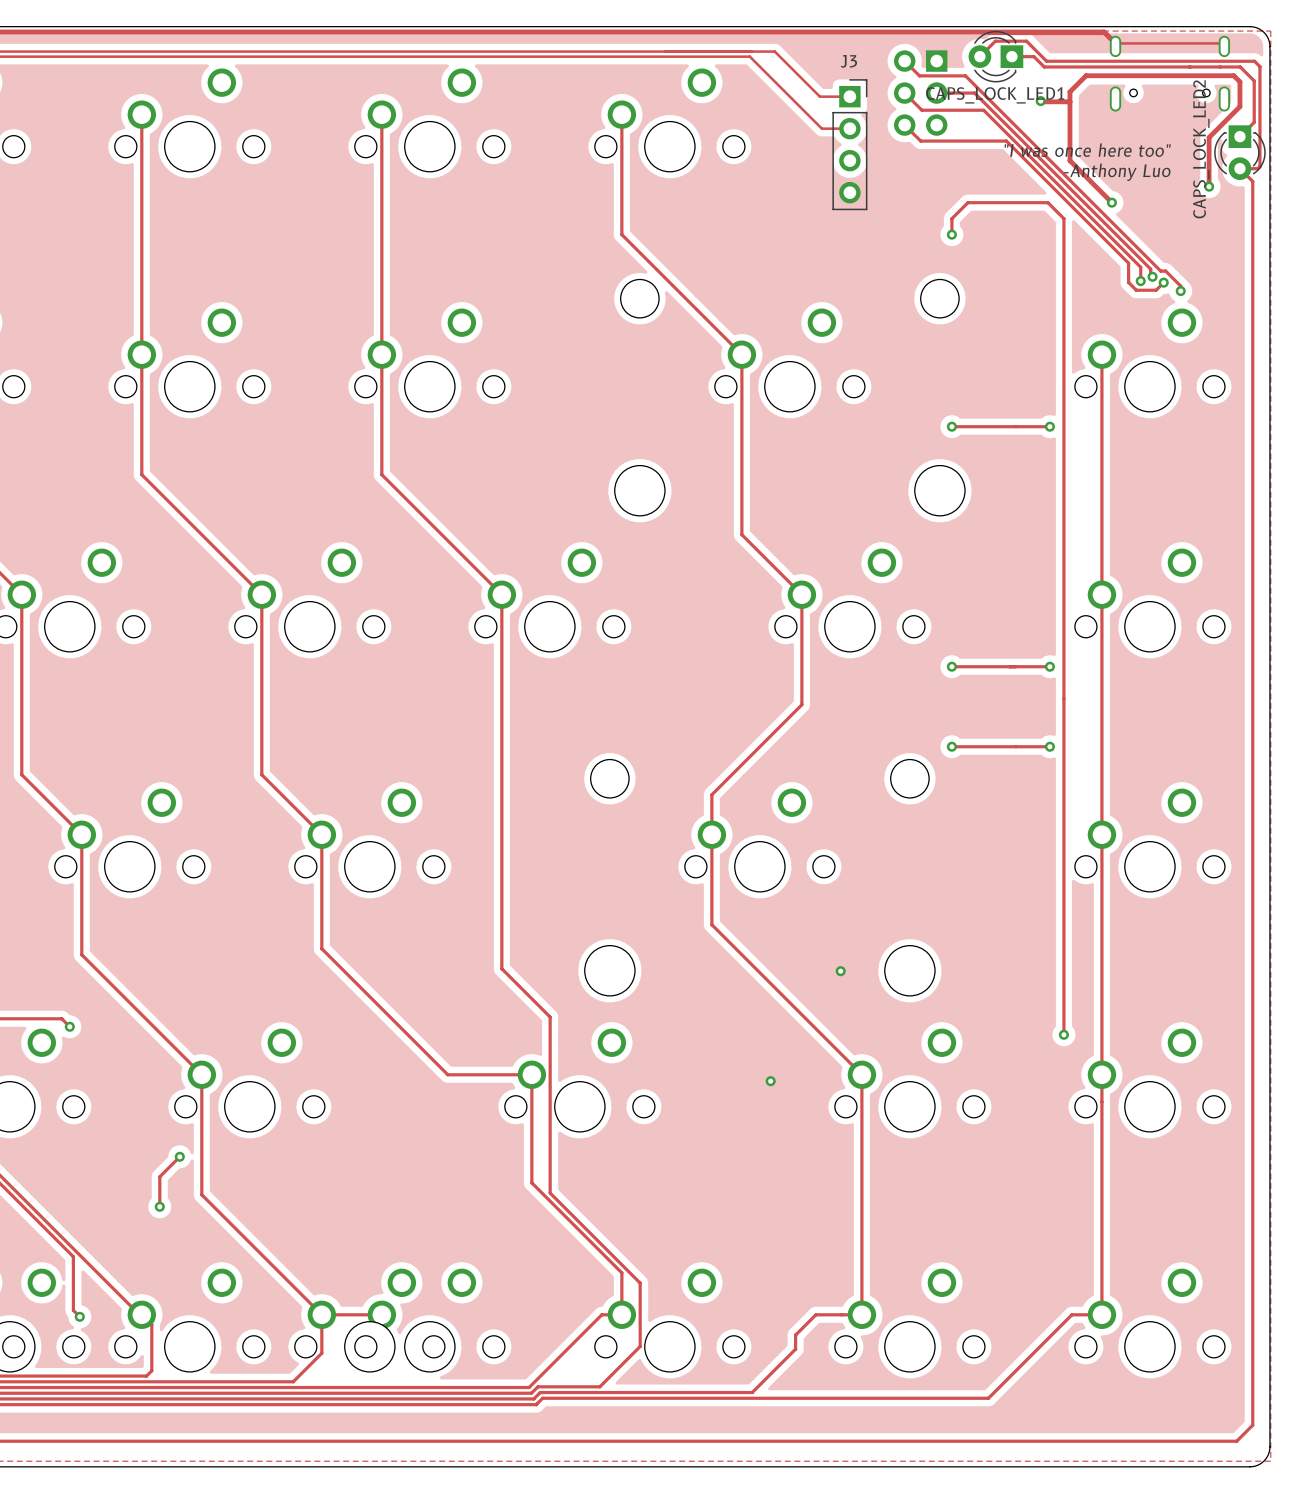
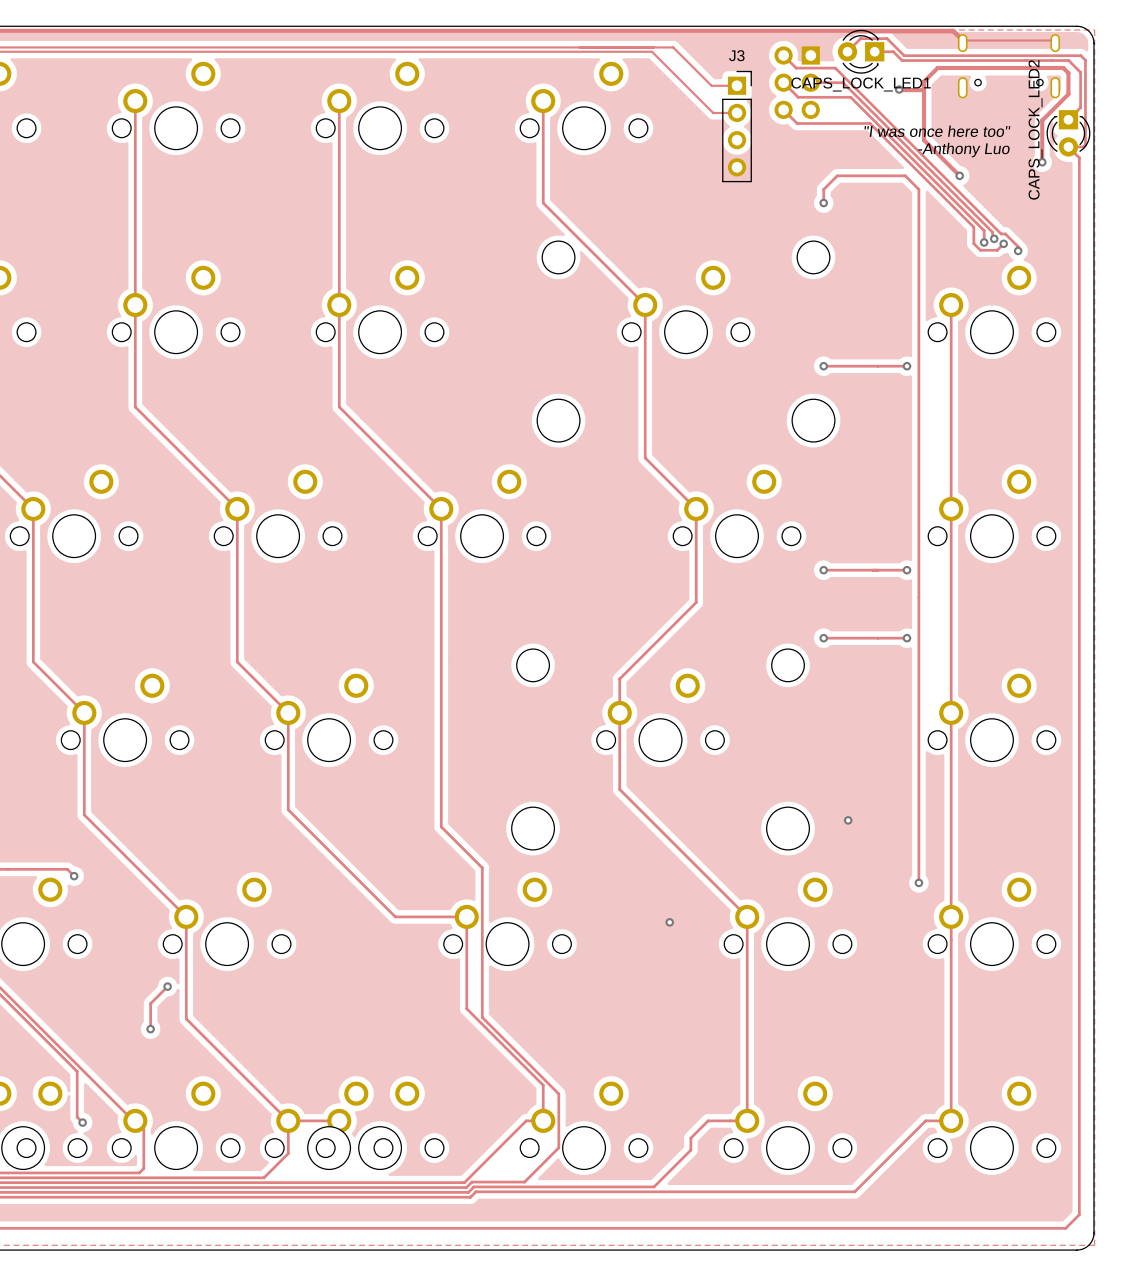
via: none -> (848, 820)
via: (840, 971) -> none

